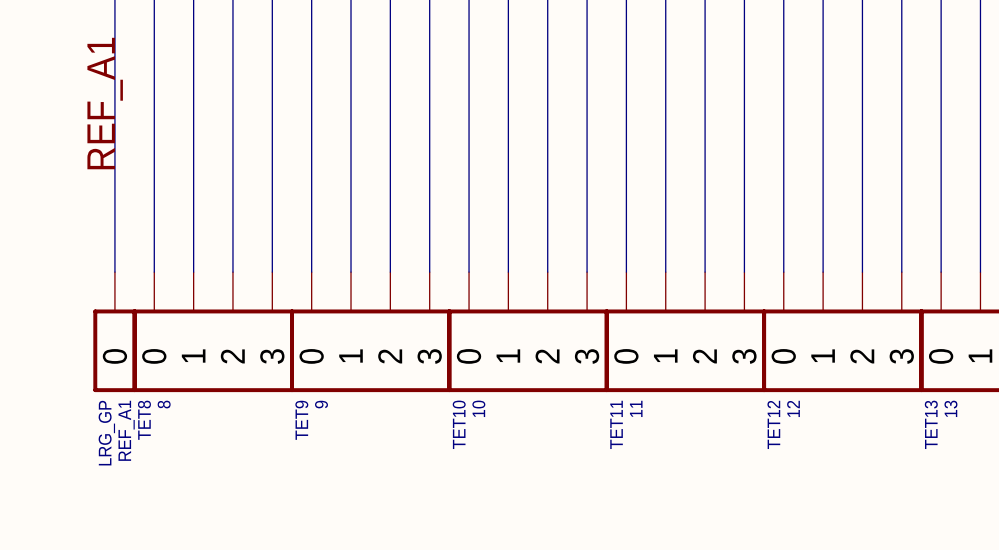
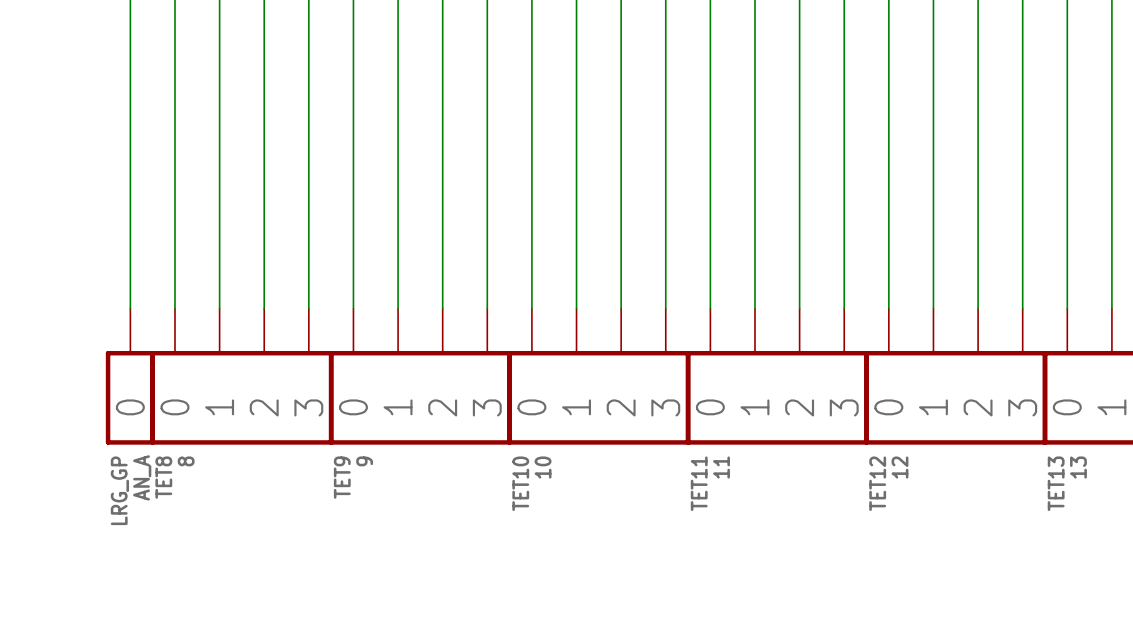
label: REF_A1 (105, 103) -> none
REF_A1 name: REF_A1 (126, 430) -> AN_A (142, 477)

